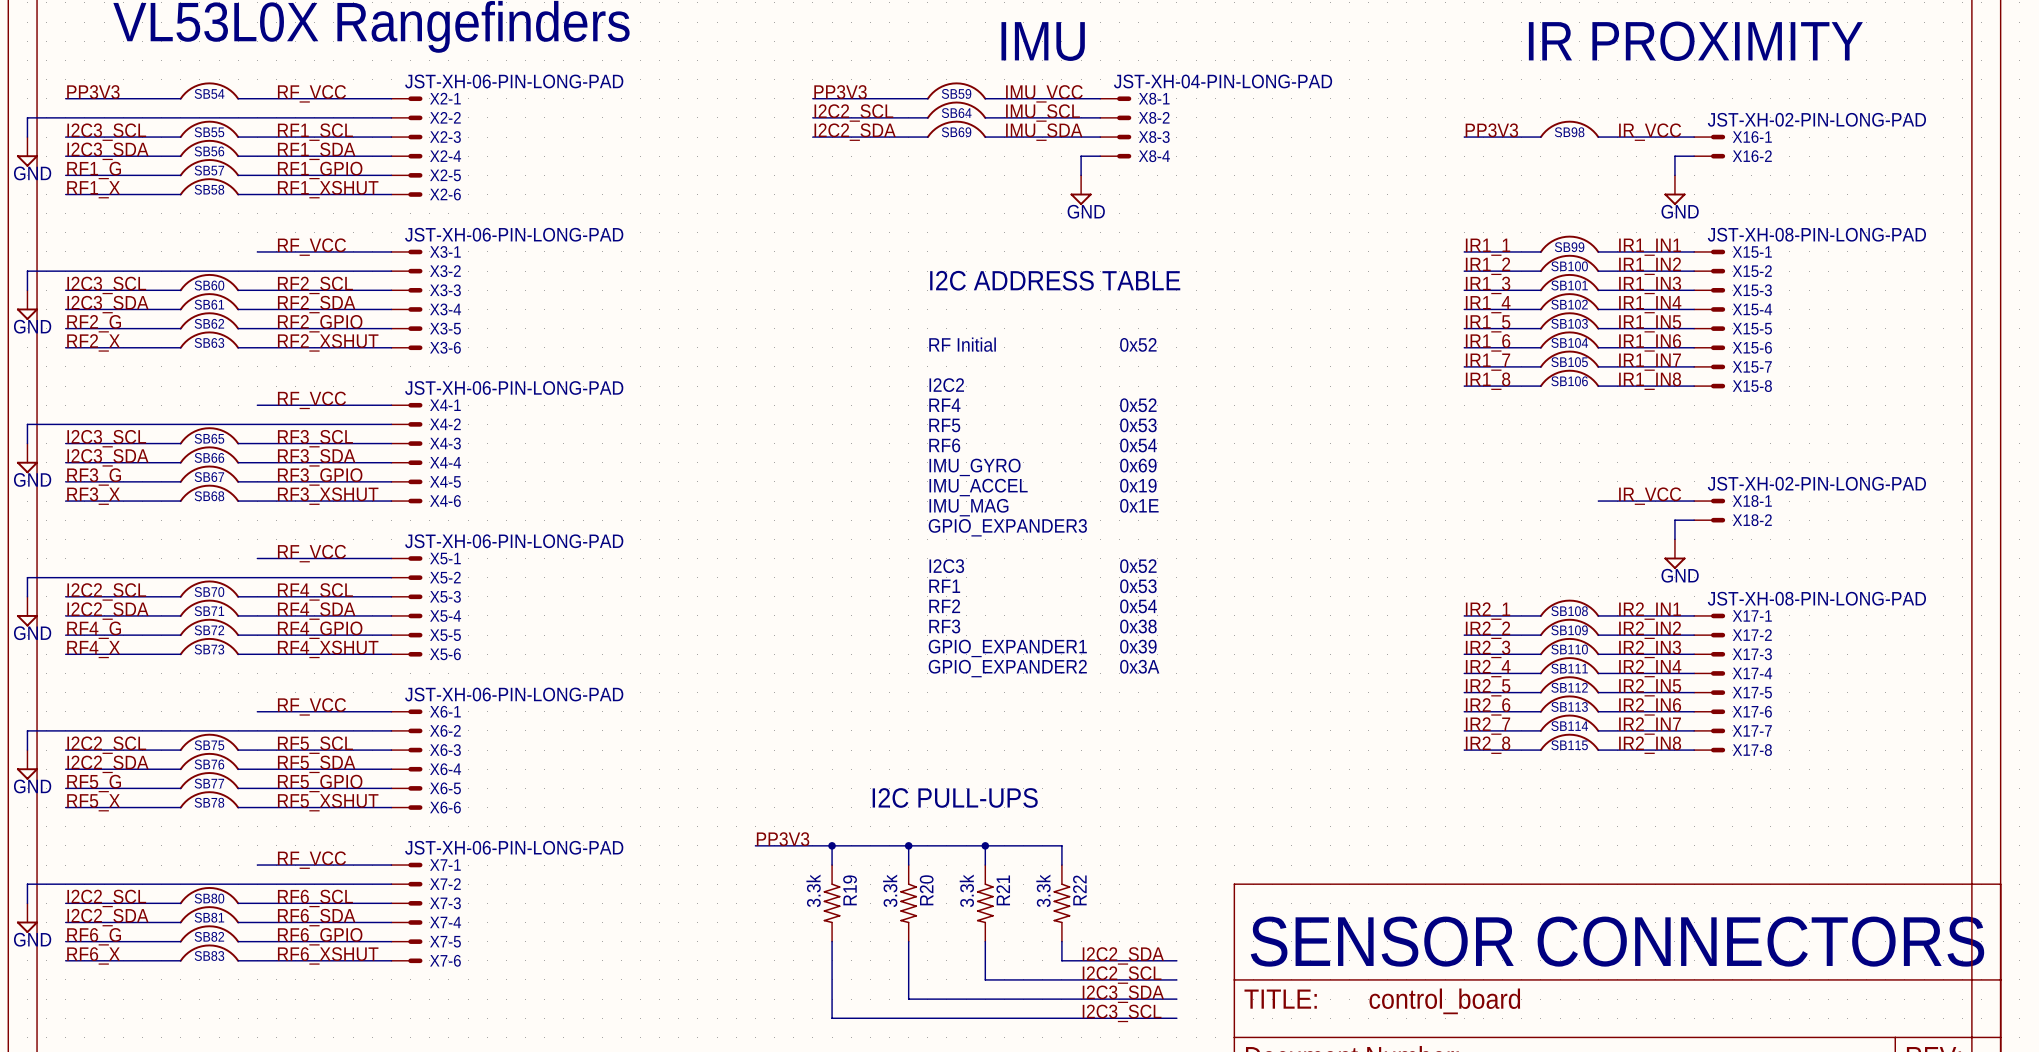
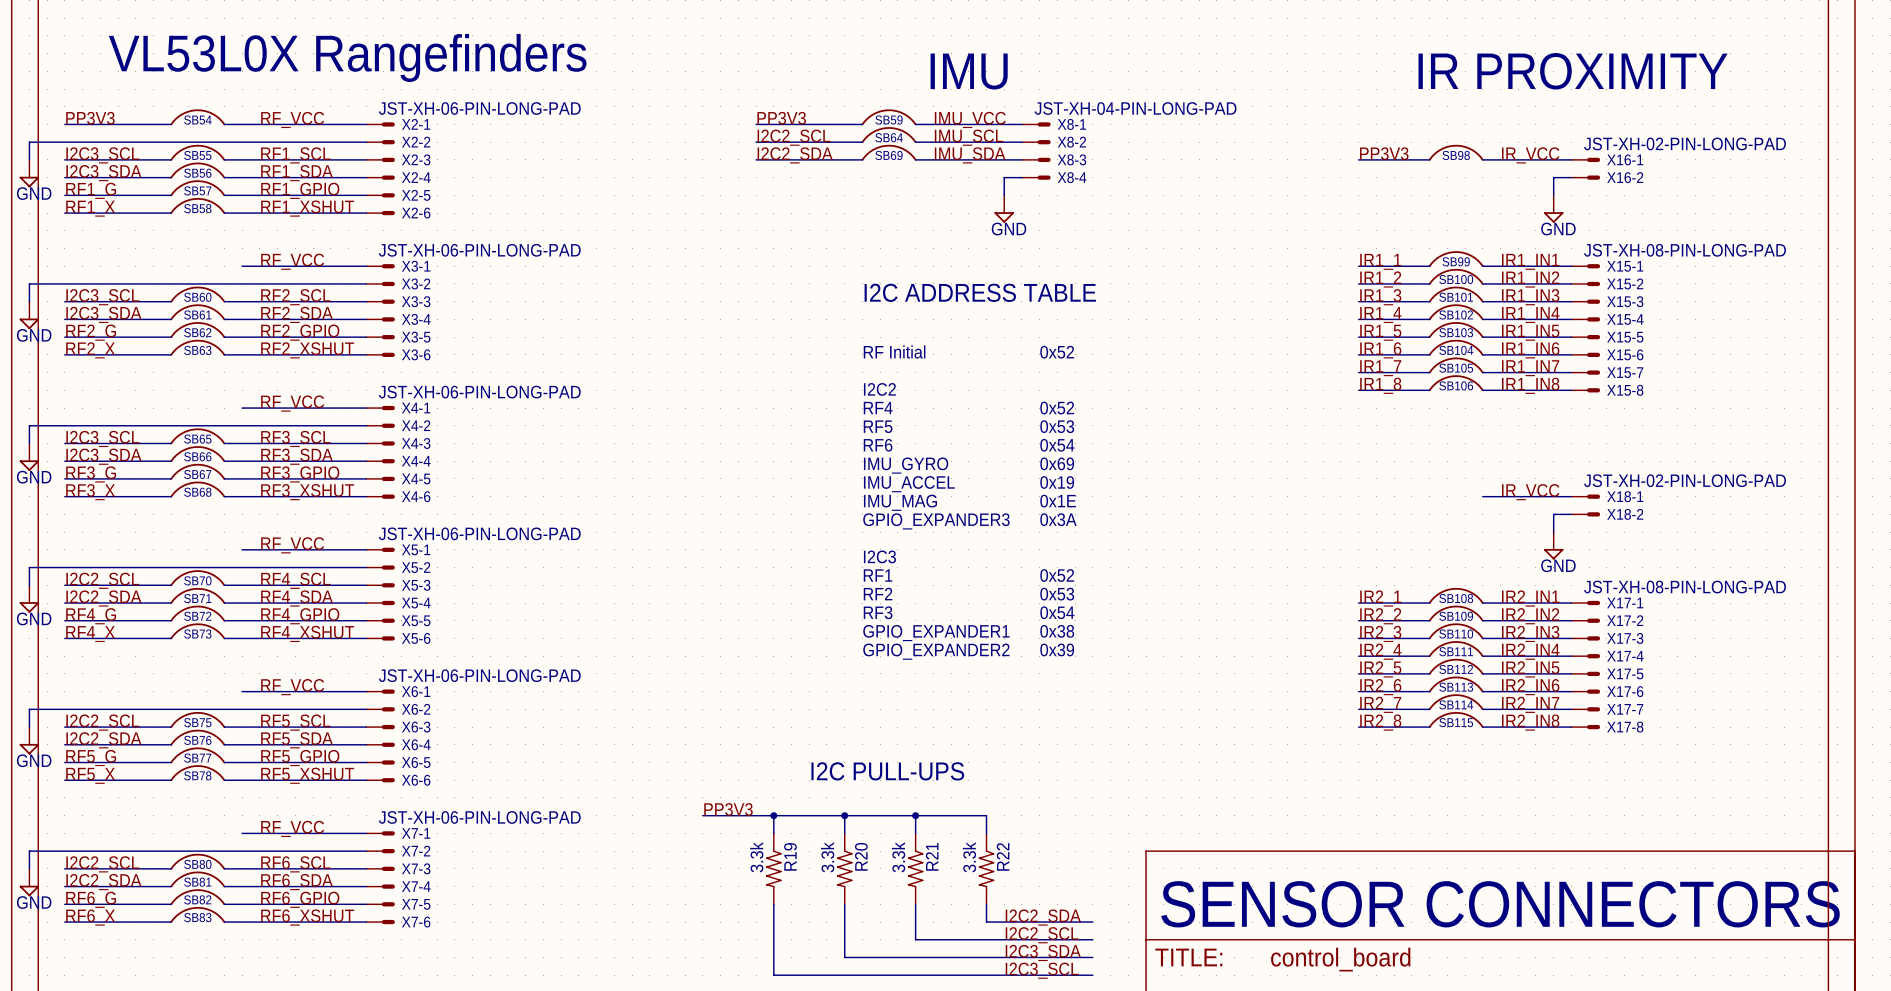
text: none -> 0x3A (1058, 519)
text: 0x52 (1138, 566) -> none
text: 0x53 (1138, 586) -> 0x52 (1057, 575)
text: 0x54 (1138, 606) -> 0x53 (1057, 594)
text: 0x38 (1138, 626) -> 0x54 (1057, 612)
text: 0x39 (1138, 646) -> 0x38 (1057, 631)
text: 0x3A (1139, 666) -> 0x39 (1057, 649)

